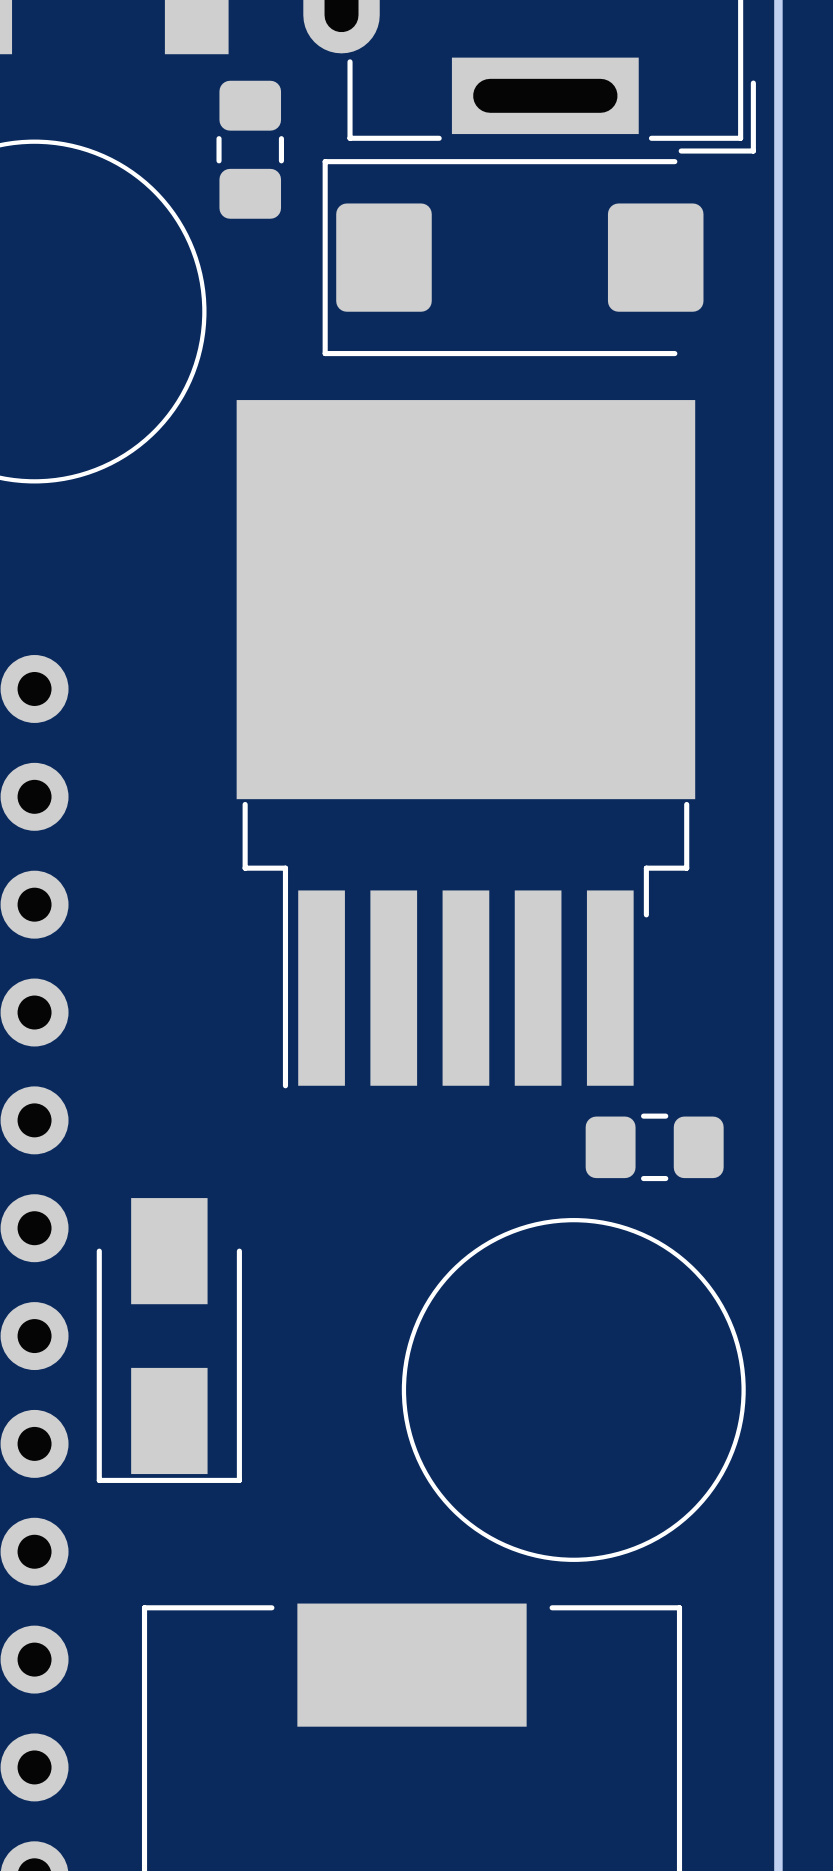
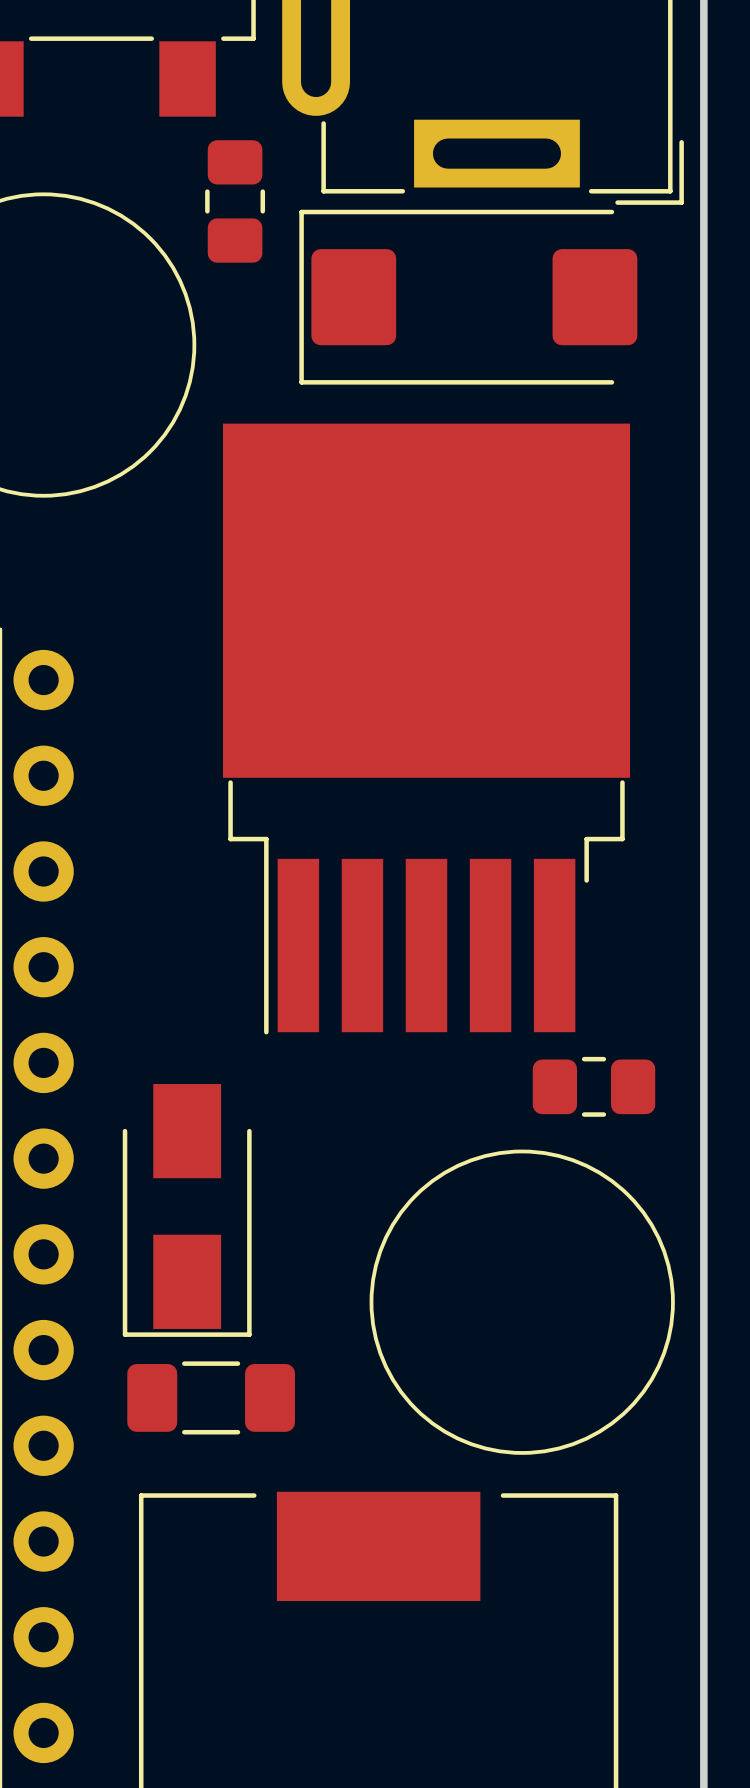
part position: (169, 1340) -> (187, 1210)
part: none -> (211, 1397)

